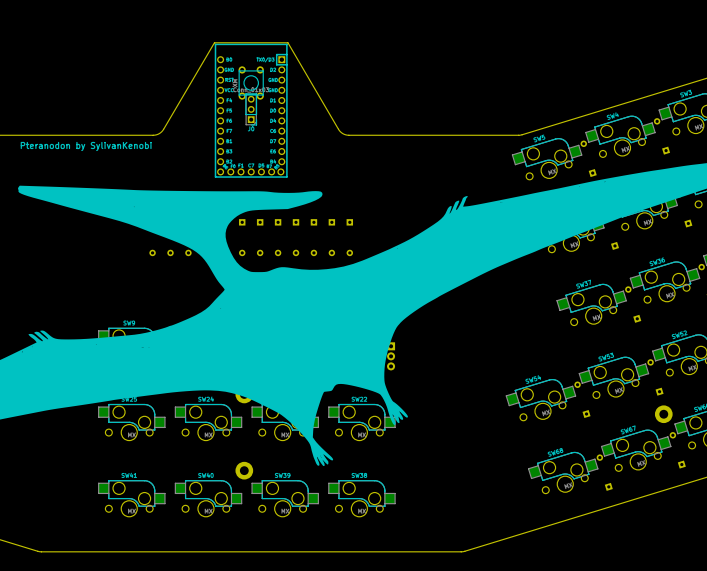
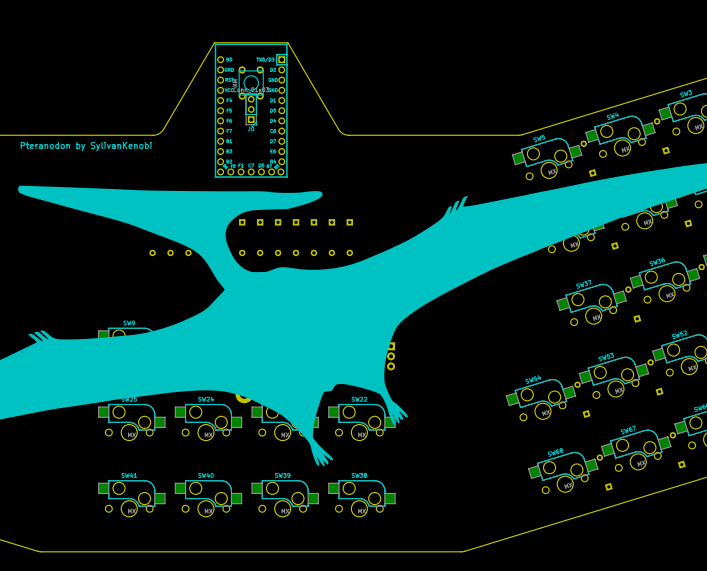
part: (663, 414) -> none
part: (244, 470) -> none

